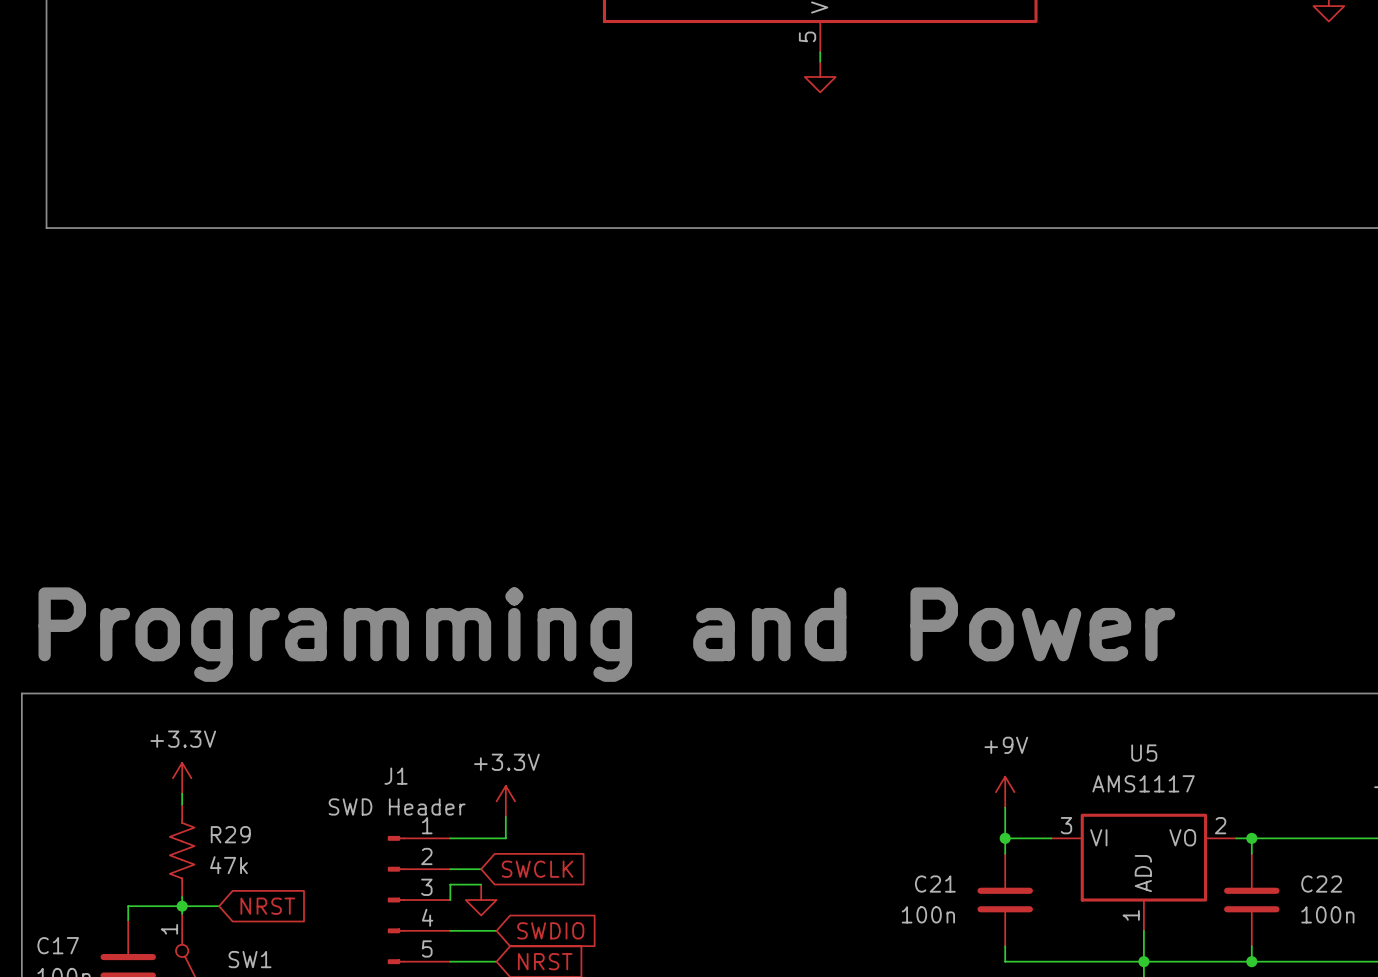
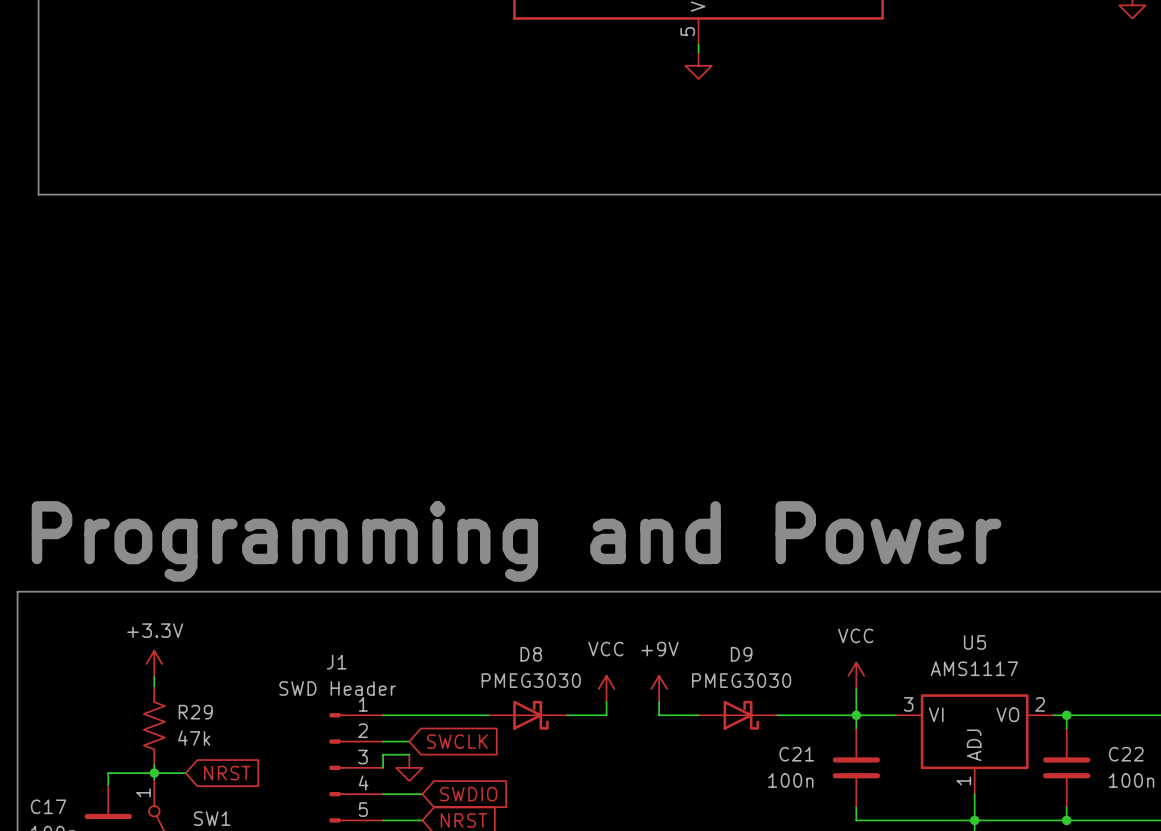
power symbol: +9V (1005, 792) -> VCC (856, 675)
power symbol: +3.3V (505, 801) -> none
power symbol: none -> VCC (606, 688)
power symbol: none -> +9V (659, 688)
wire: (505, 816) (505, 838) -> (488, 715) (430, 715)
wire: none -> (606, 702) (606, 715) (567, 715)
wire: none -> (659, 702) (659, 715) (698, 715)
D8: none -> PMEG3030 (527, 715)
D9: none -> PMEG3030 (738, 715)
wire: none -> (777, 715) (856, 715)

